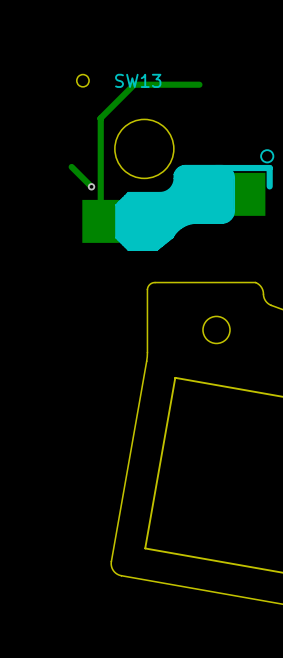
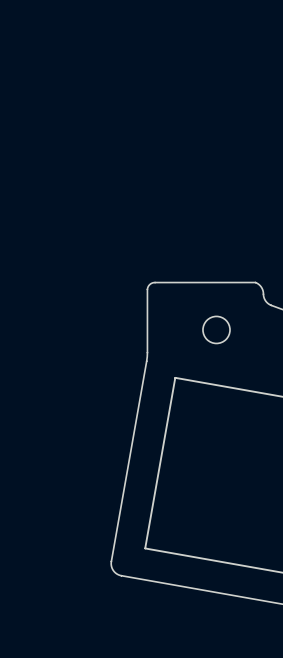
track: (199, 84) (134, 84) (100, 118) (100, 221) -> none
SW13: (175, 162) -> none
track: (71, 166) (91, 186) -> none
via: (91, 186) -> none

